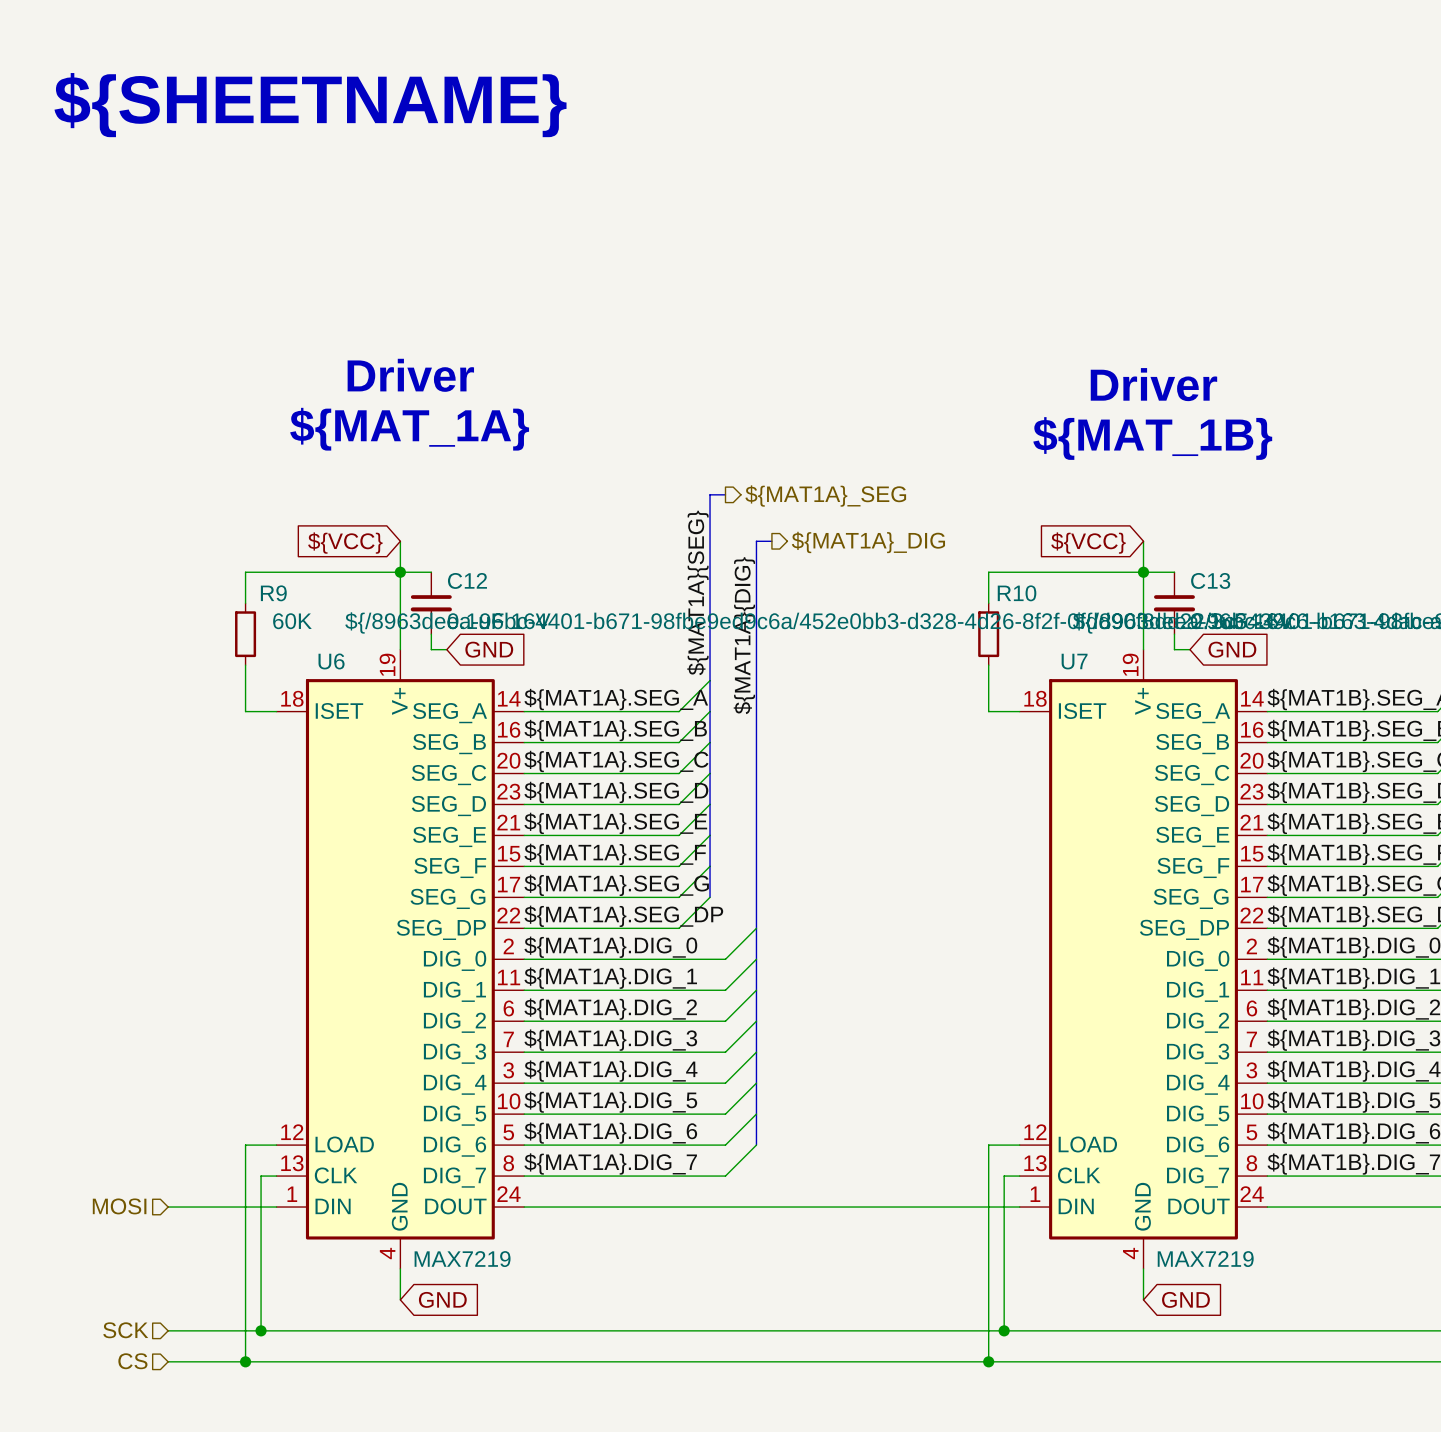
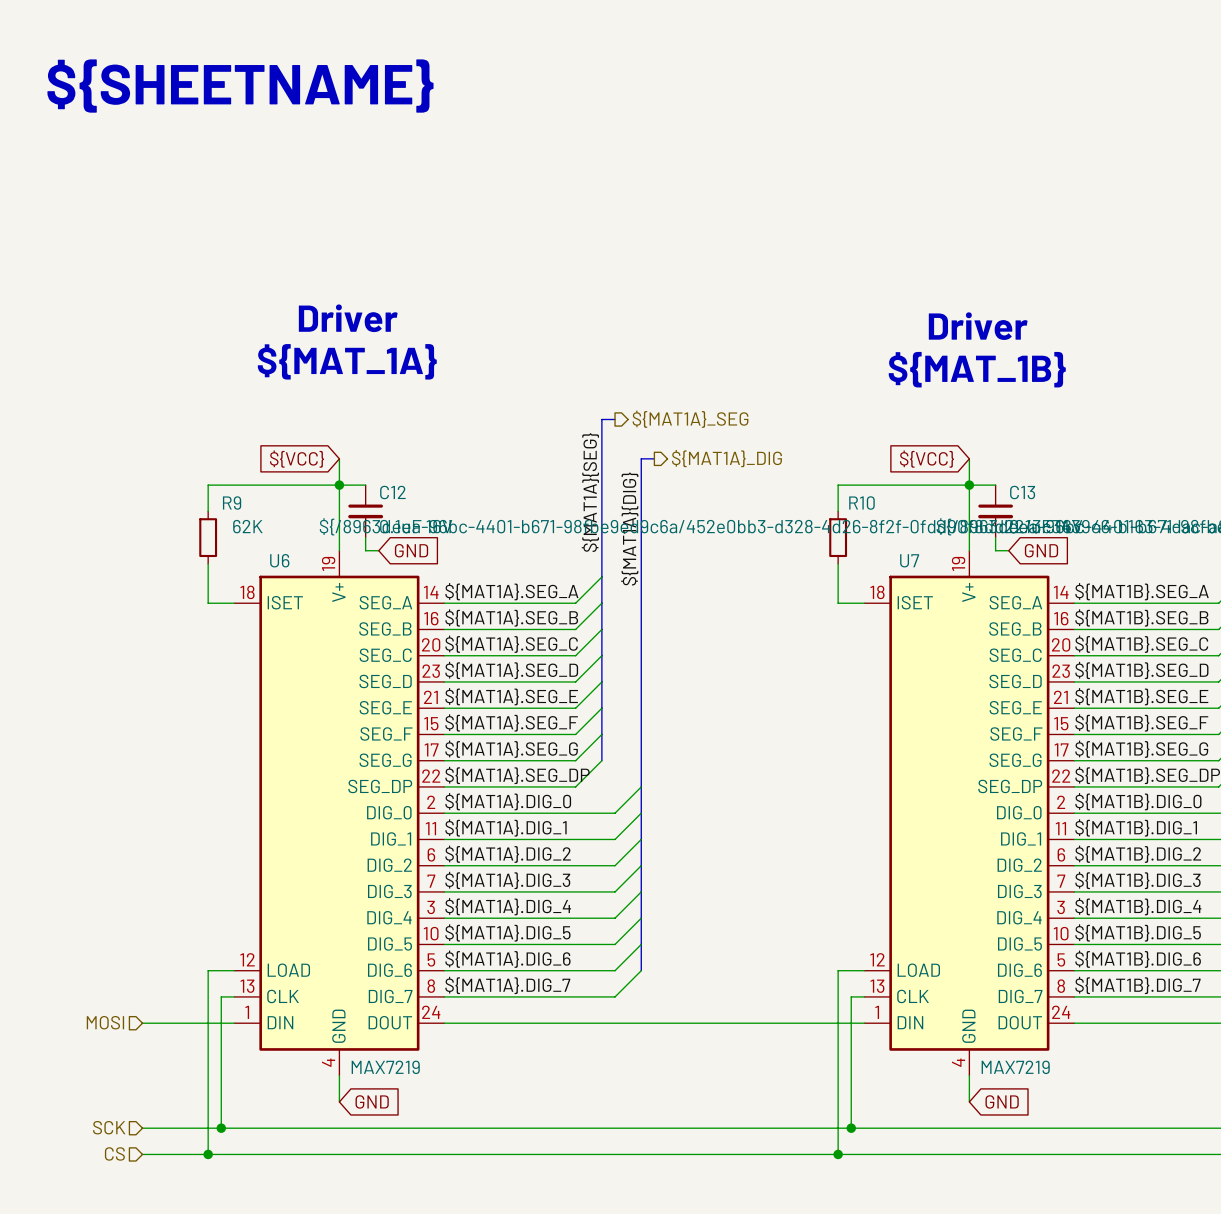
R9 value: 60K (292, 621) -> 62K (247, 526)

